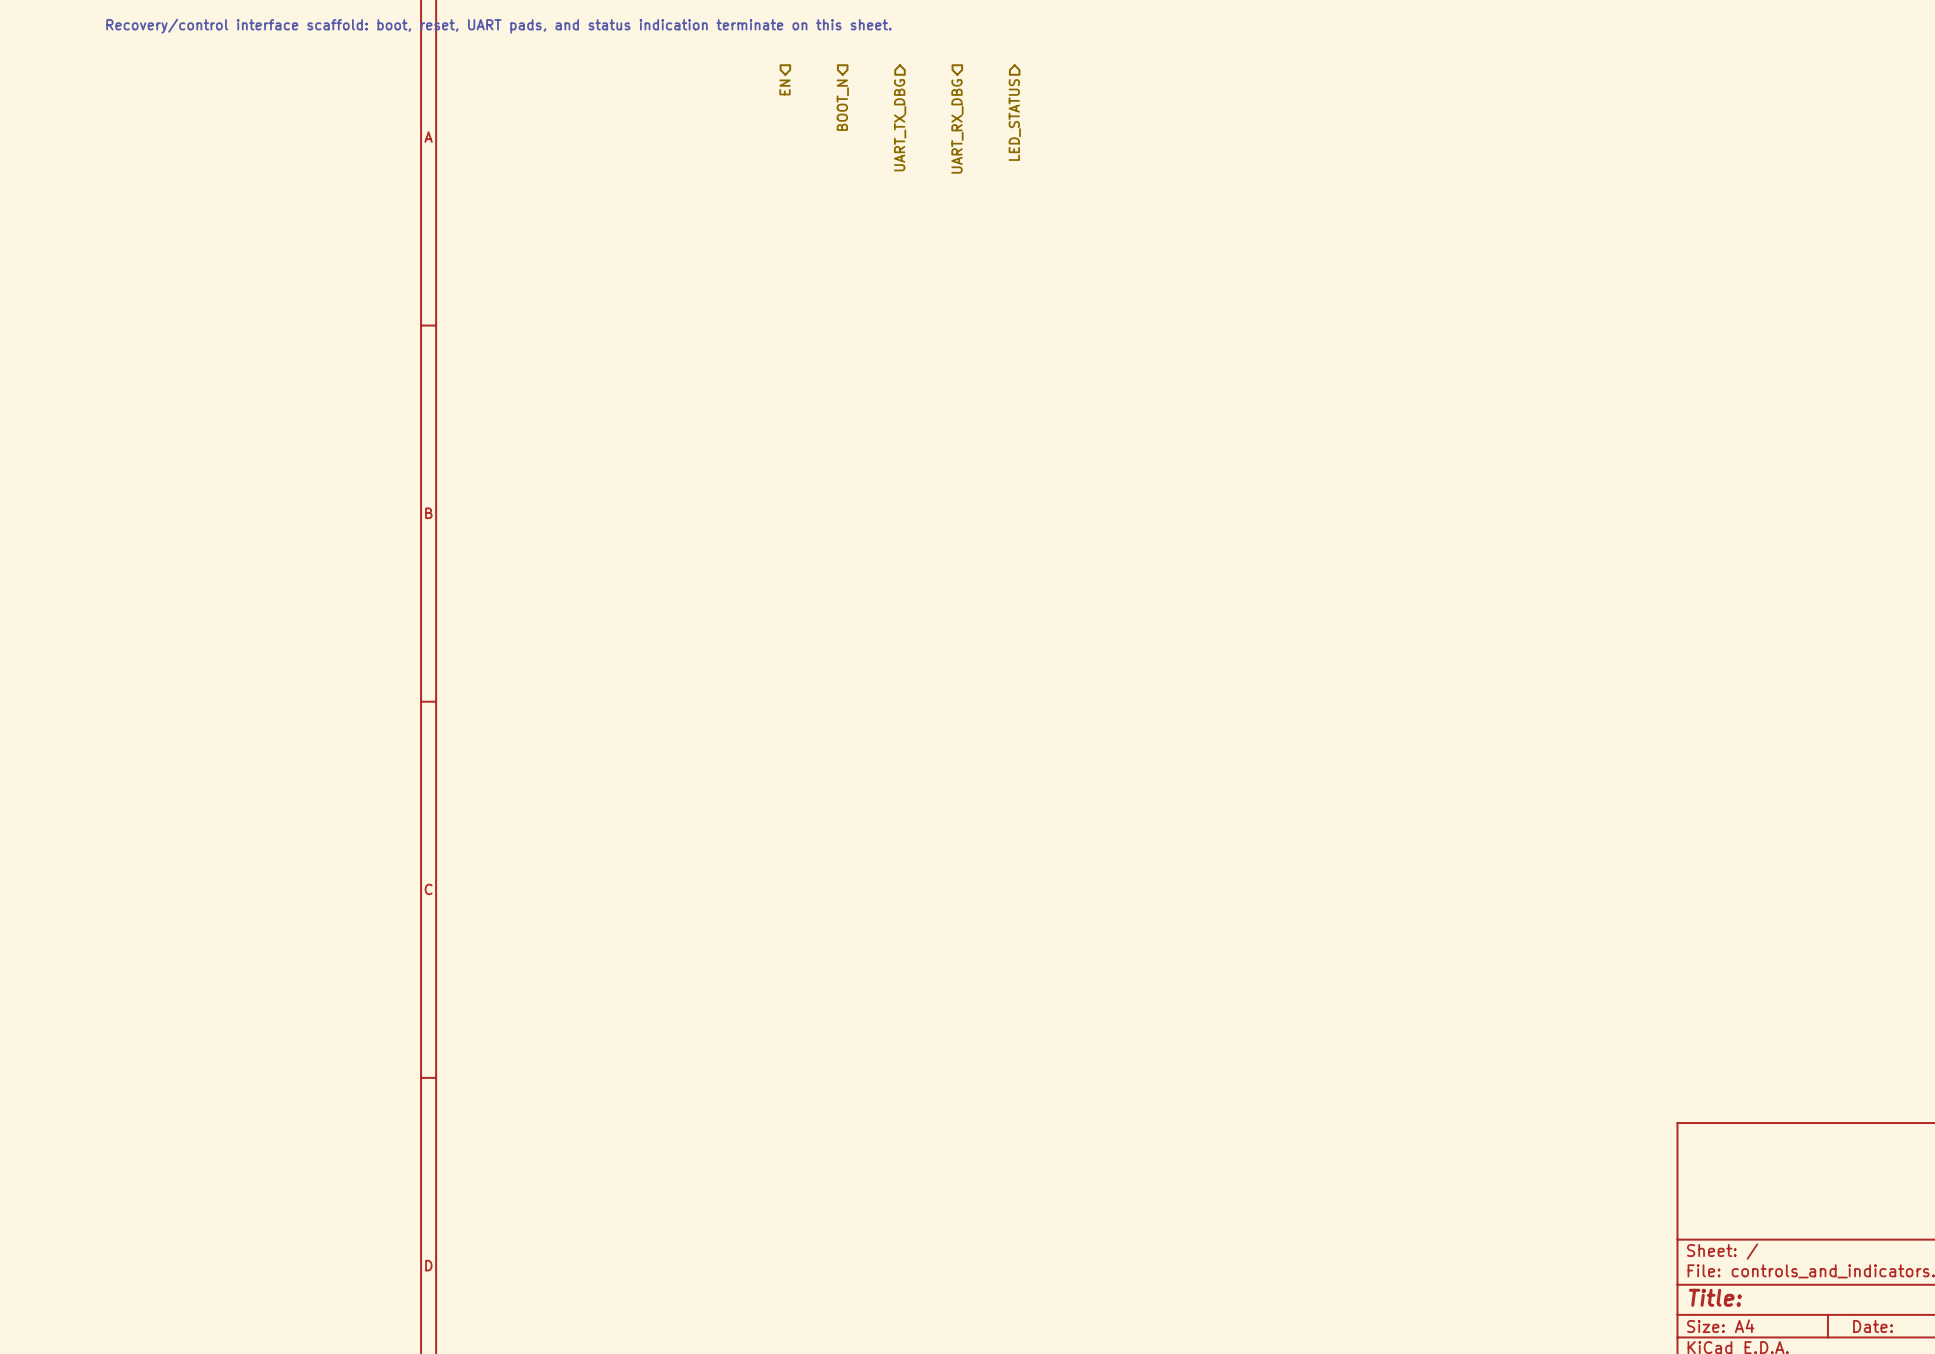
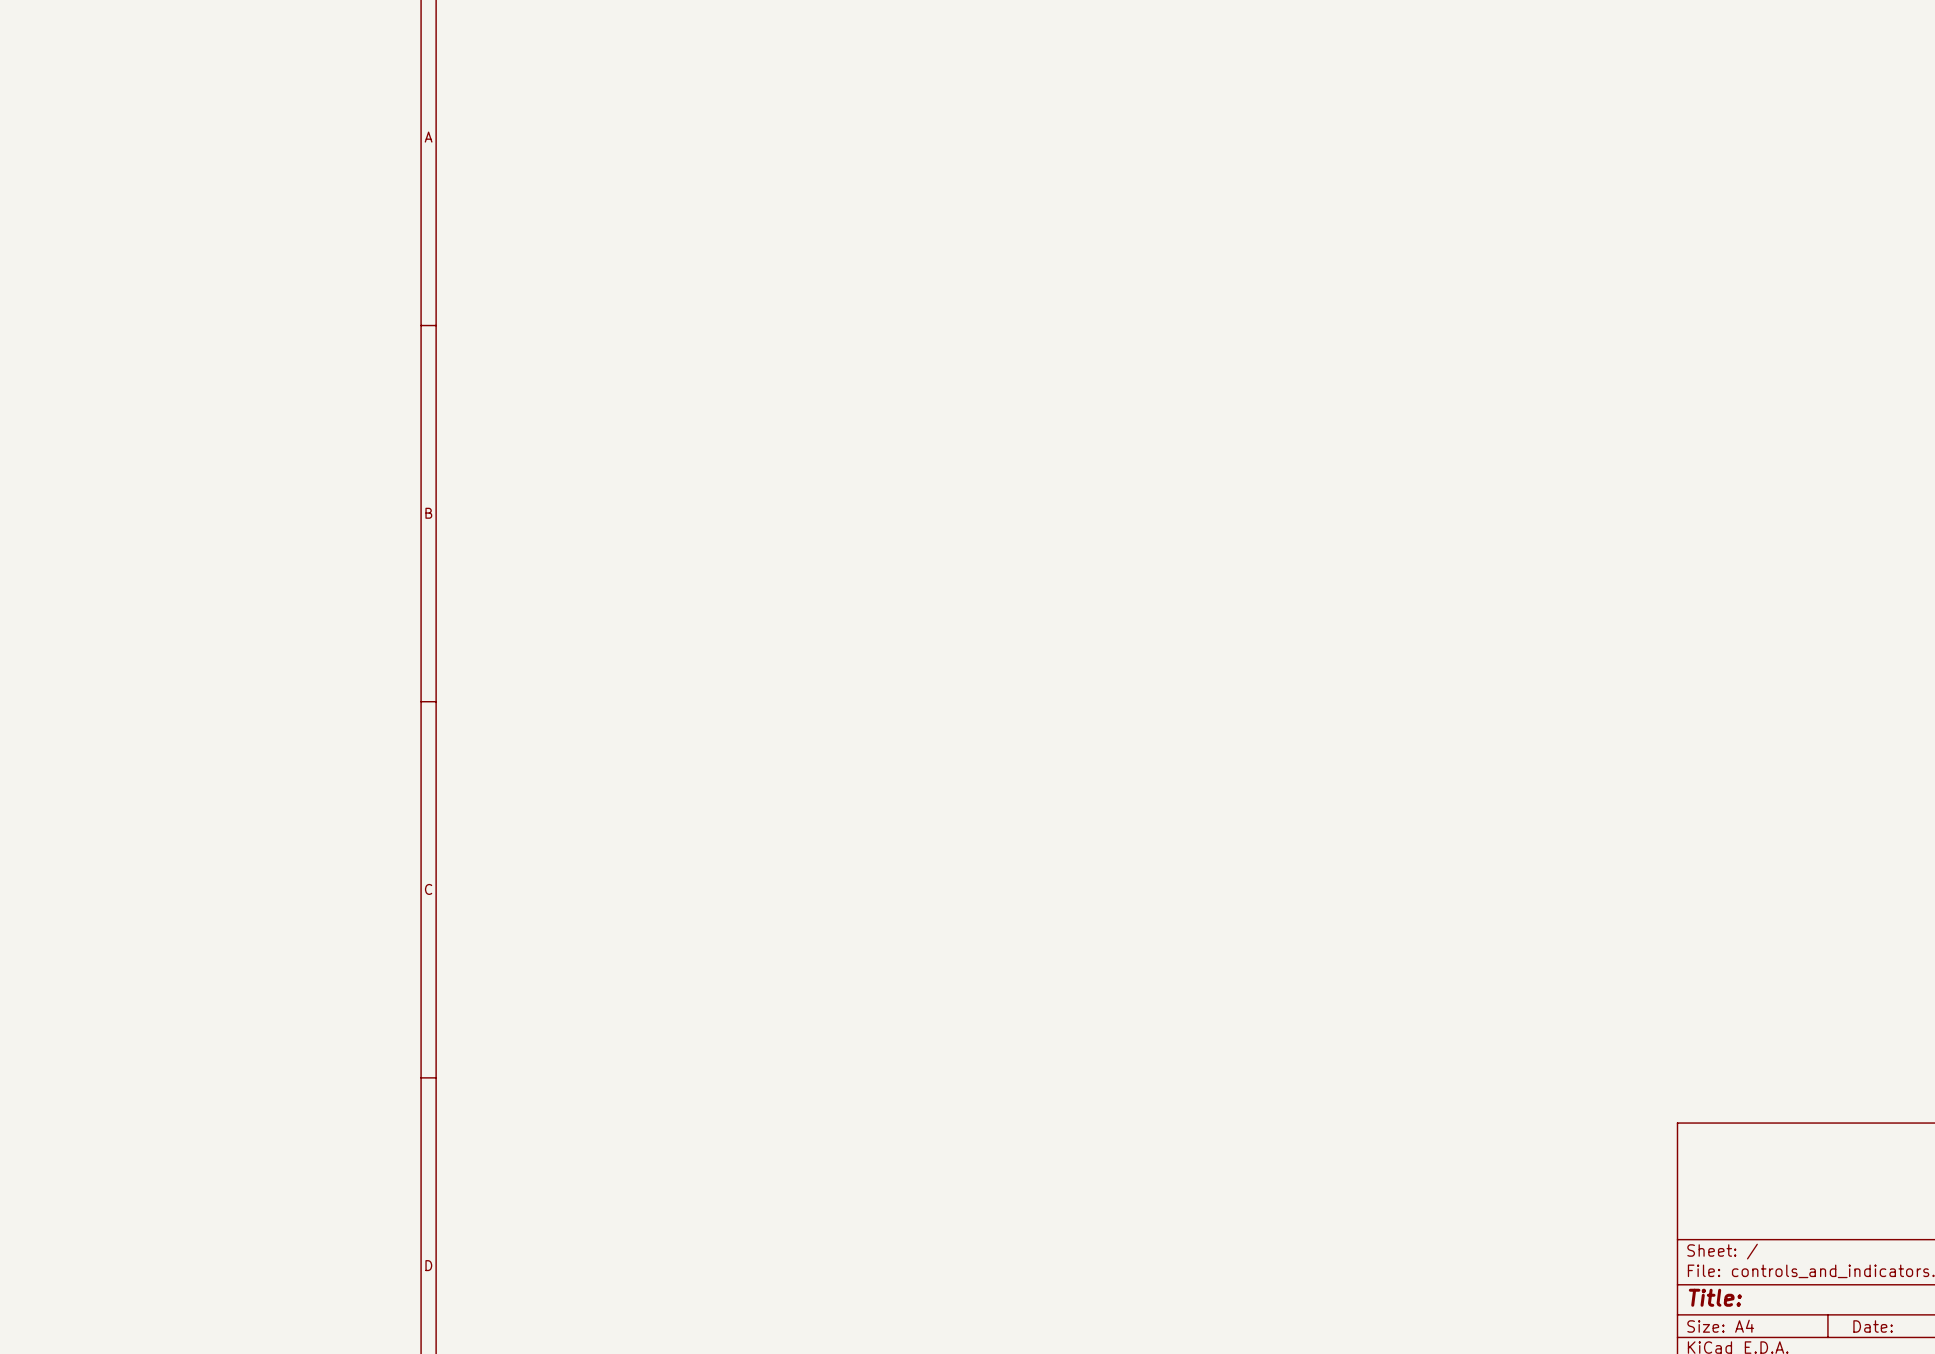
text: Recovery/control interface scaffold: boot, reset, UART pads, and status indication terminate on this sheet. (498, 26) -> none
hierarchical label: EN (785, 87) -> none
hierarchical label: BOOT_N (842, 105) -> none
hierarchical label: LED_STATUS (1014, 119) -> none
hierarchical label: UART_TX_DBG (900, 125) -> none
hierarchical label: UART_RX_DBG (957, 126) -> none

